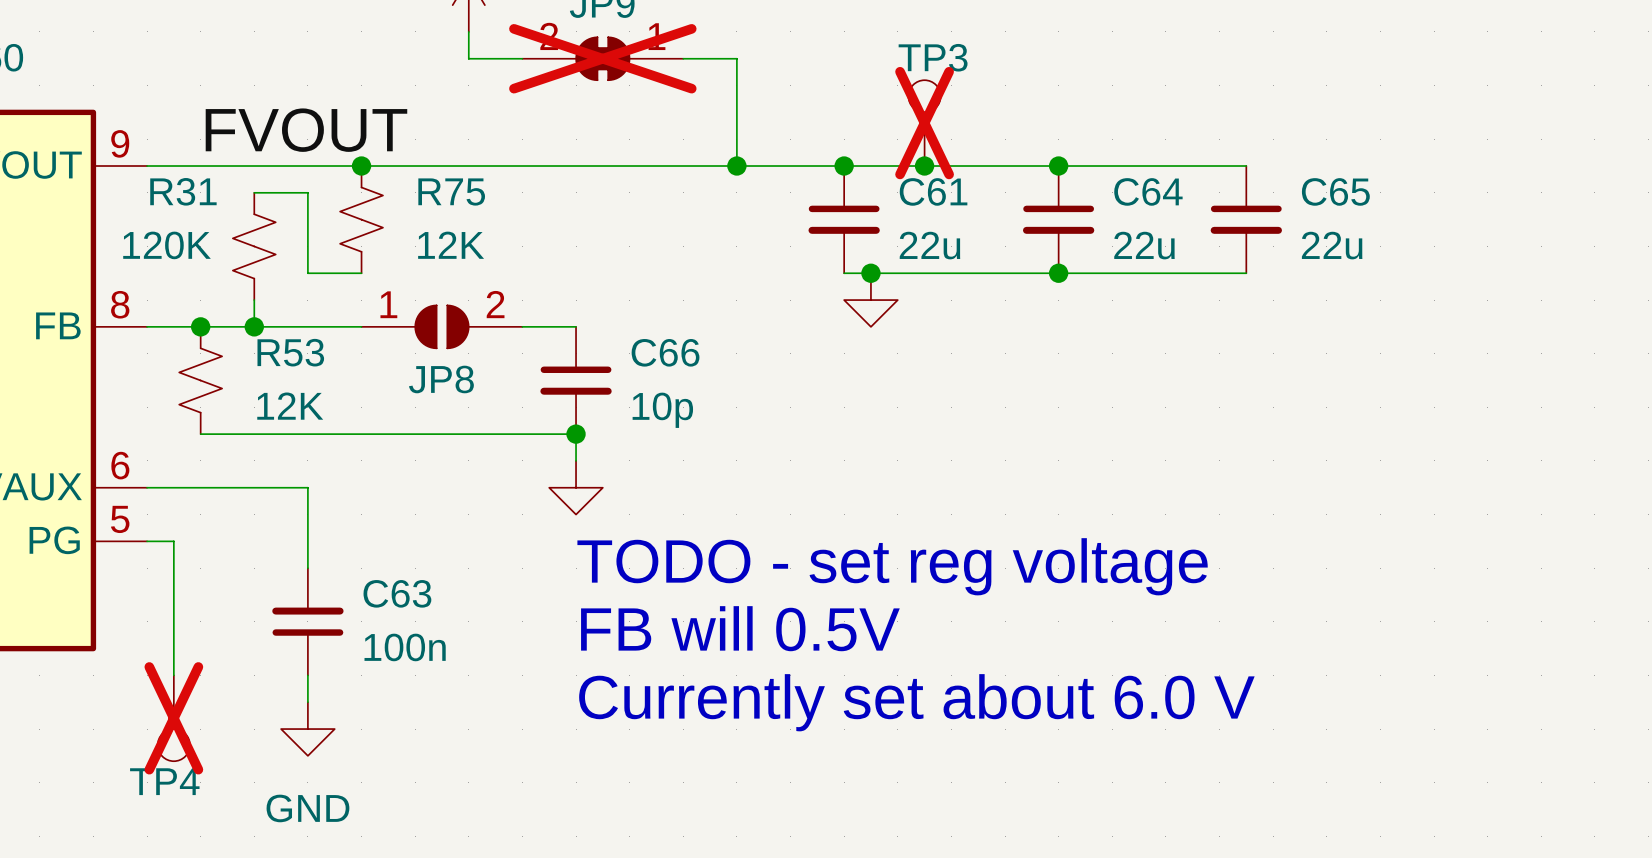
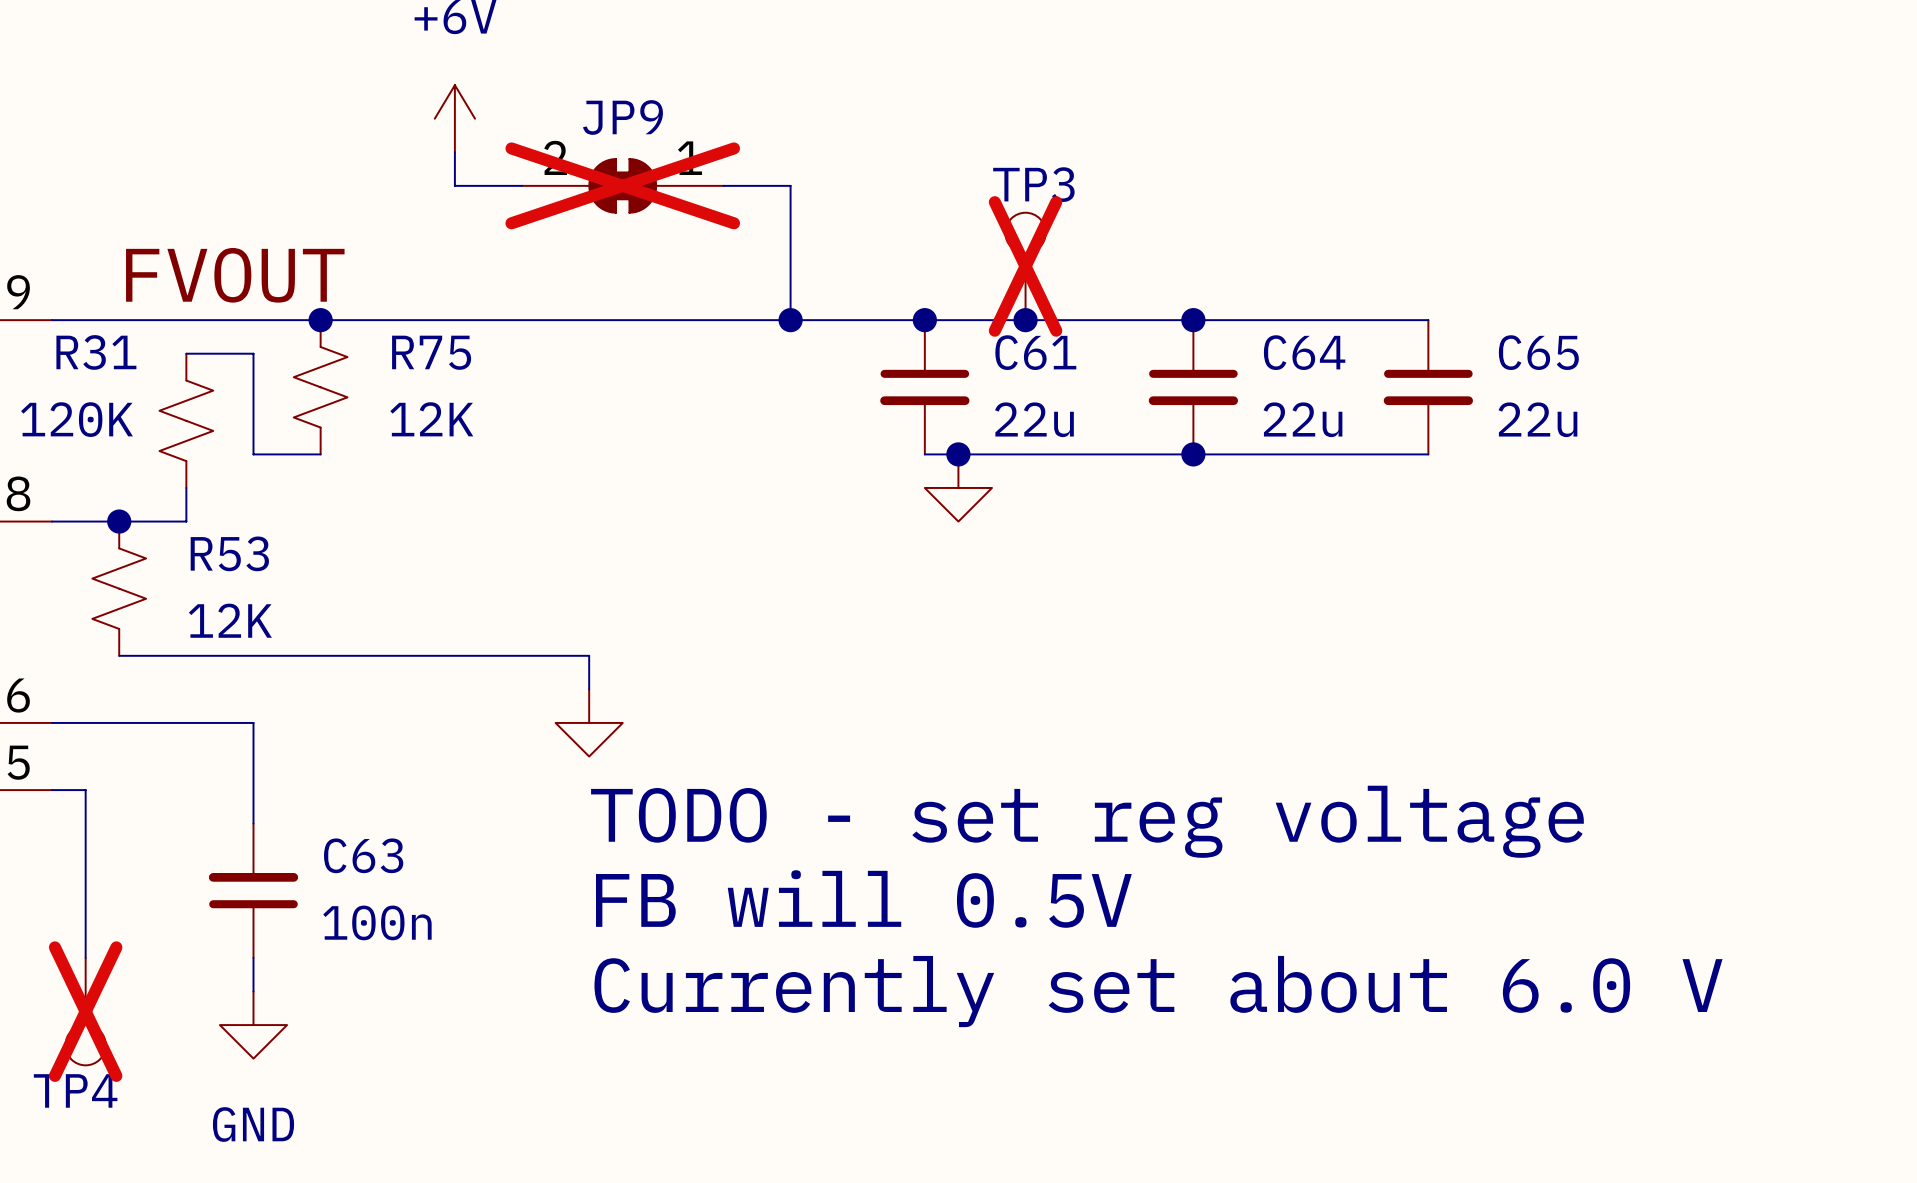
wire: (254, 326) (361, 326) -> none
junction: (254, 326) -> none
JP8: (441, 326) -> none
wire: (522, 326) (576, 326) -> none
C66: 10p (576, 380) -> none
junction: (576, 434) -> none

